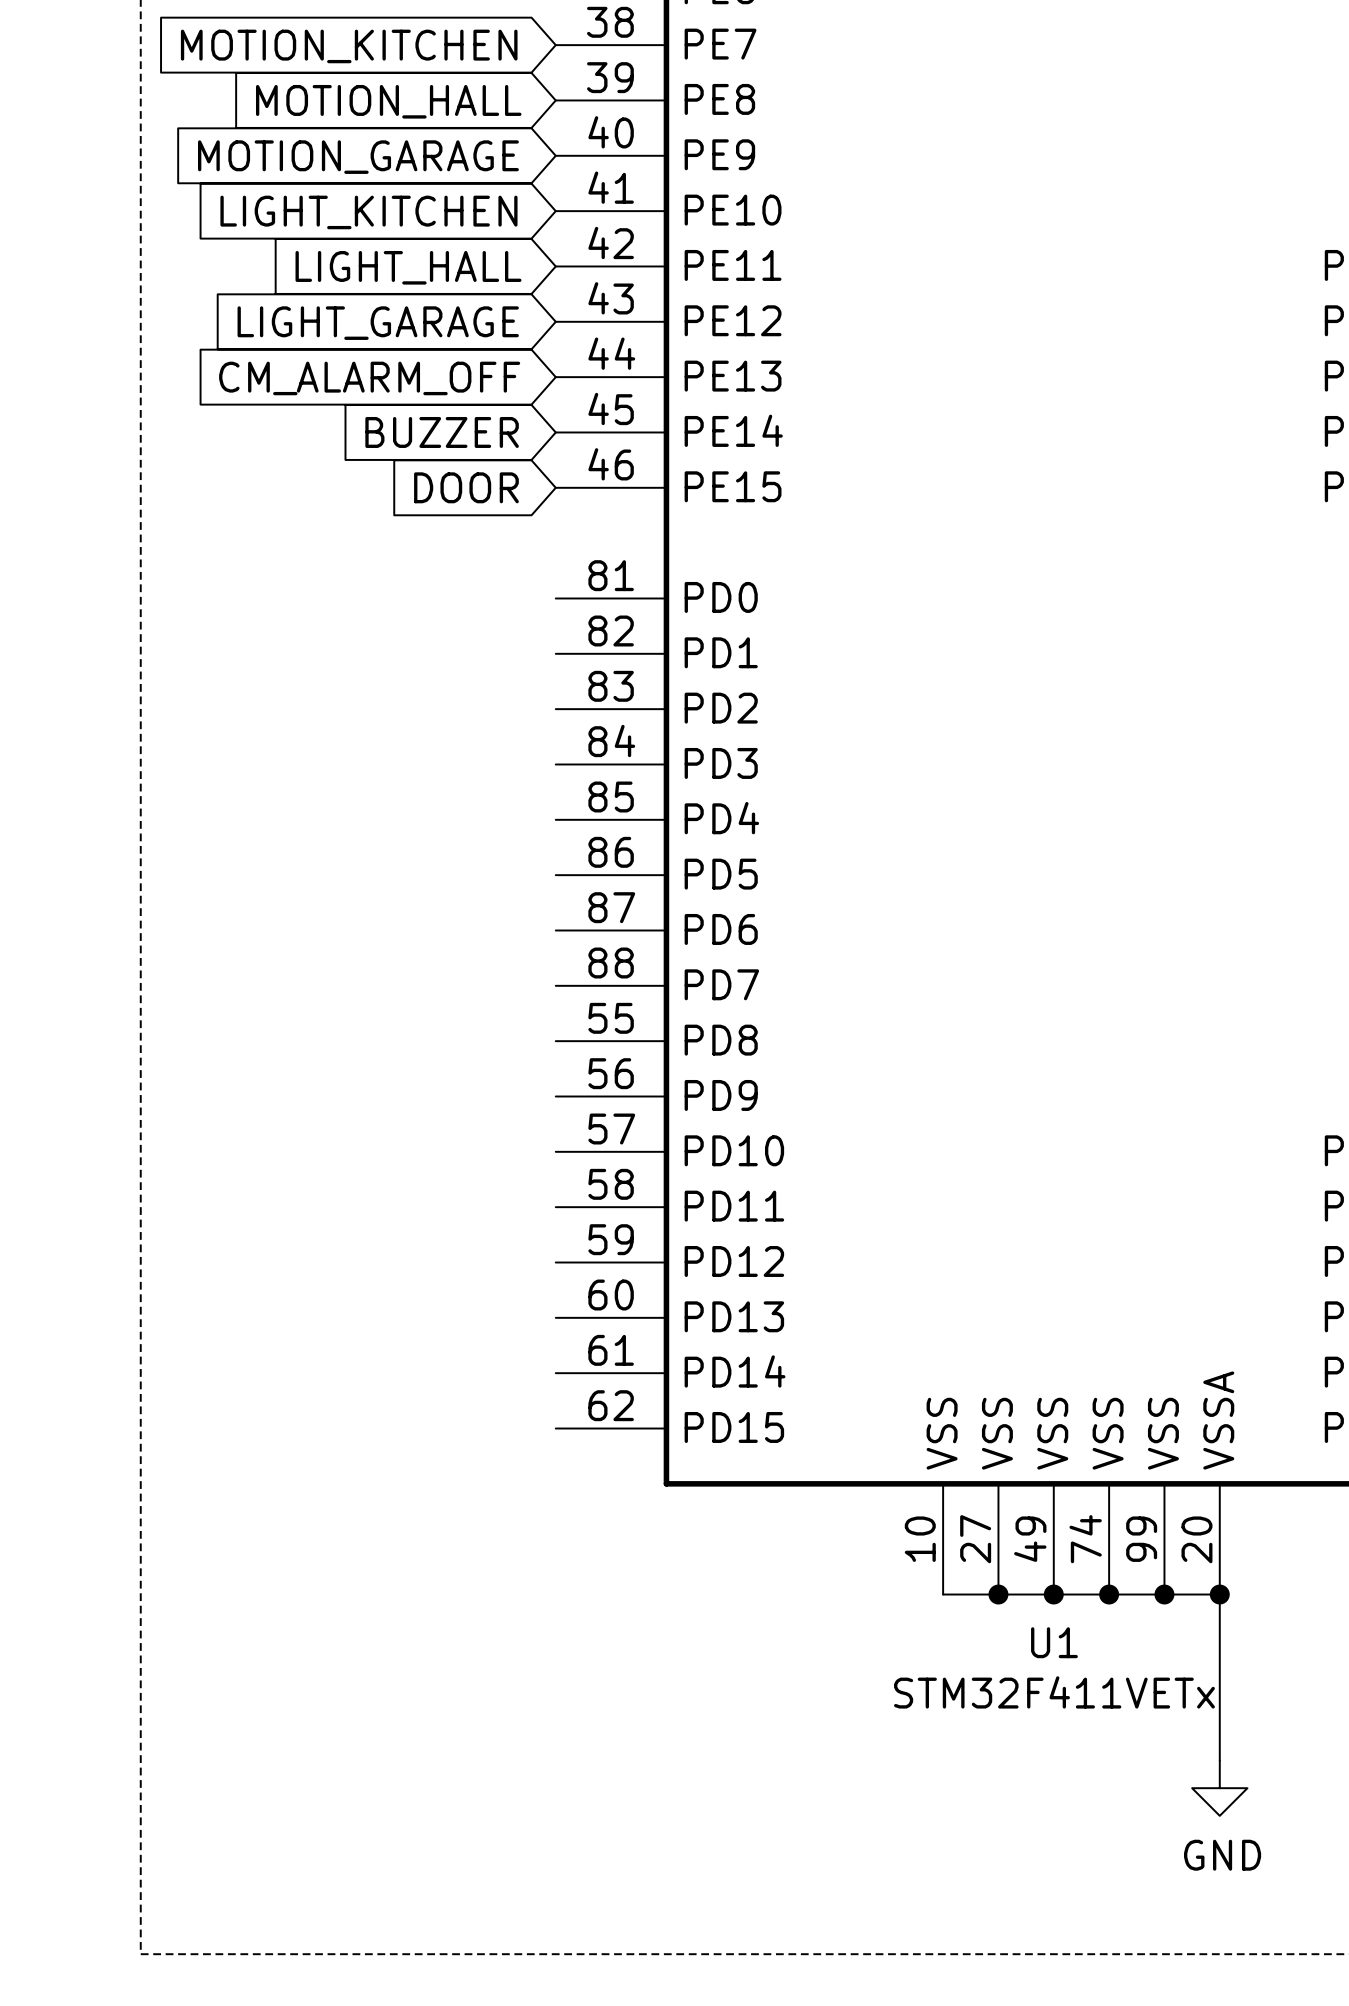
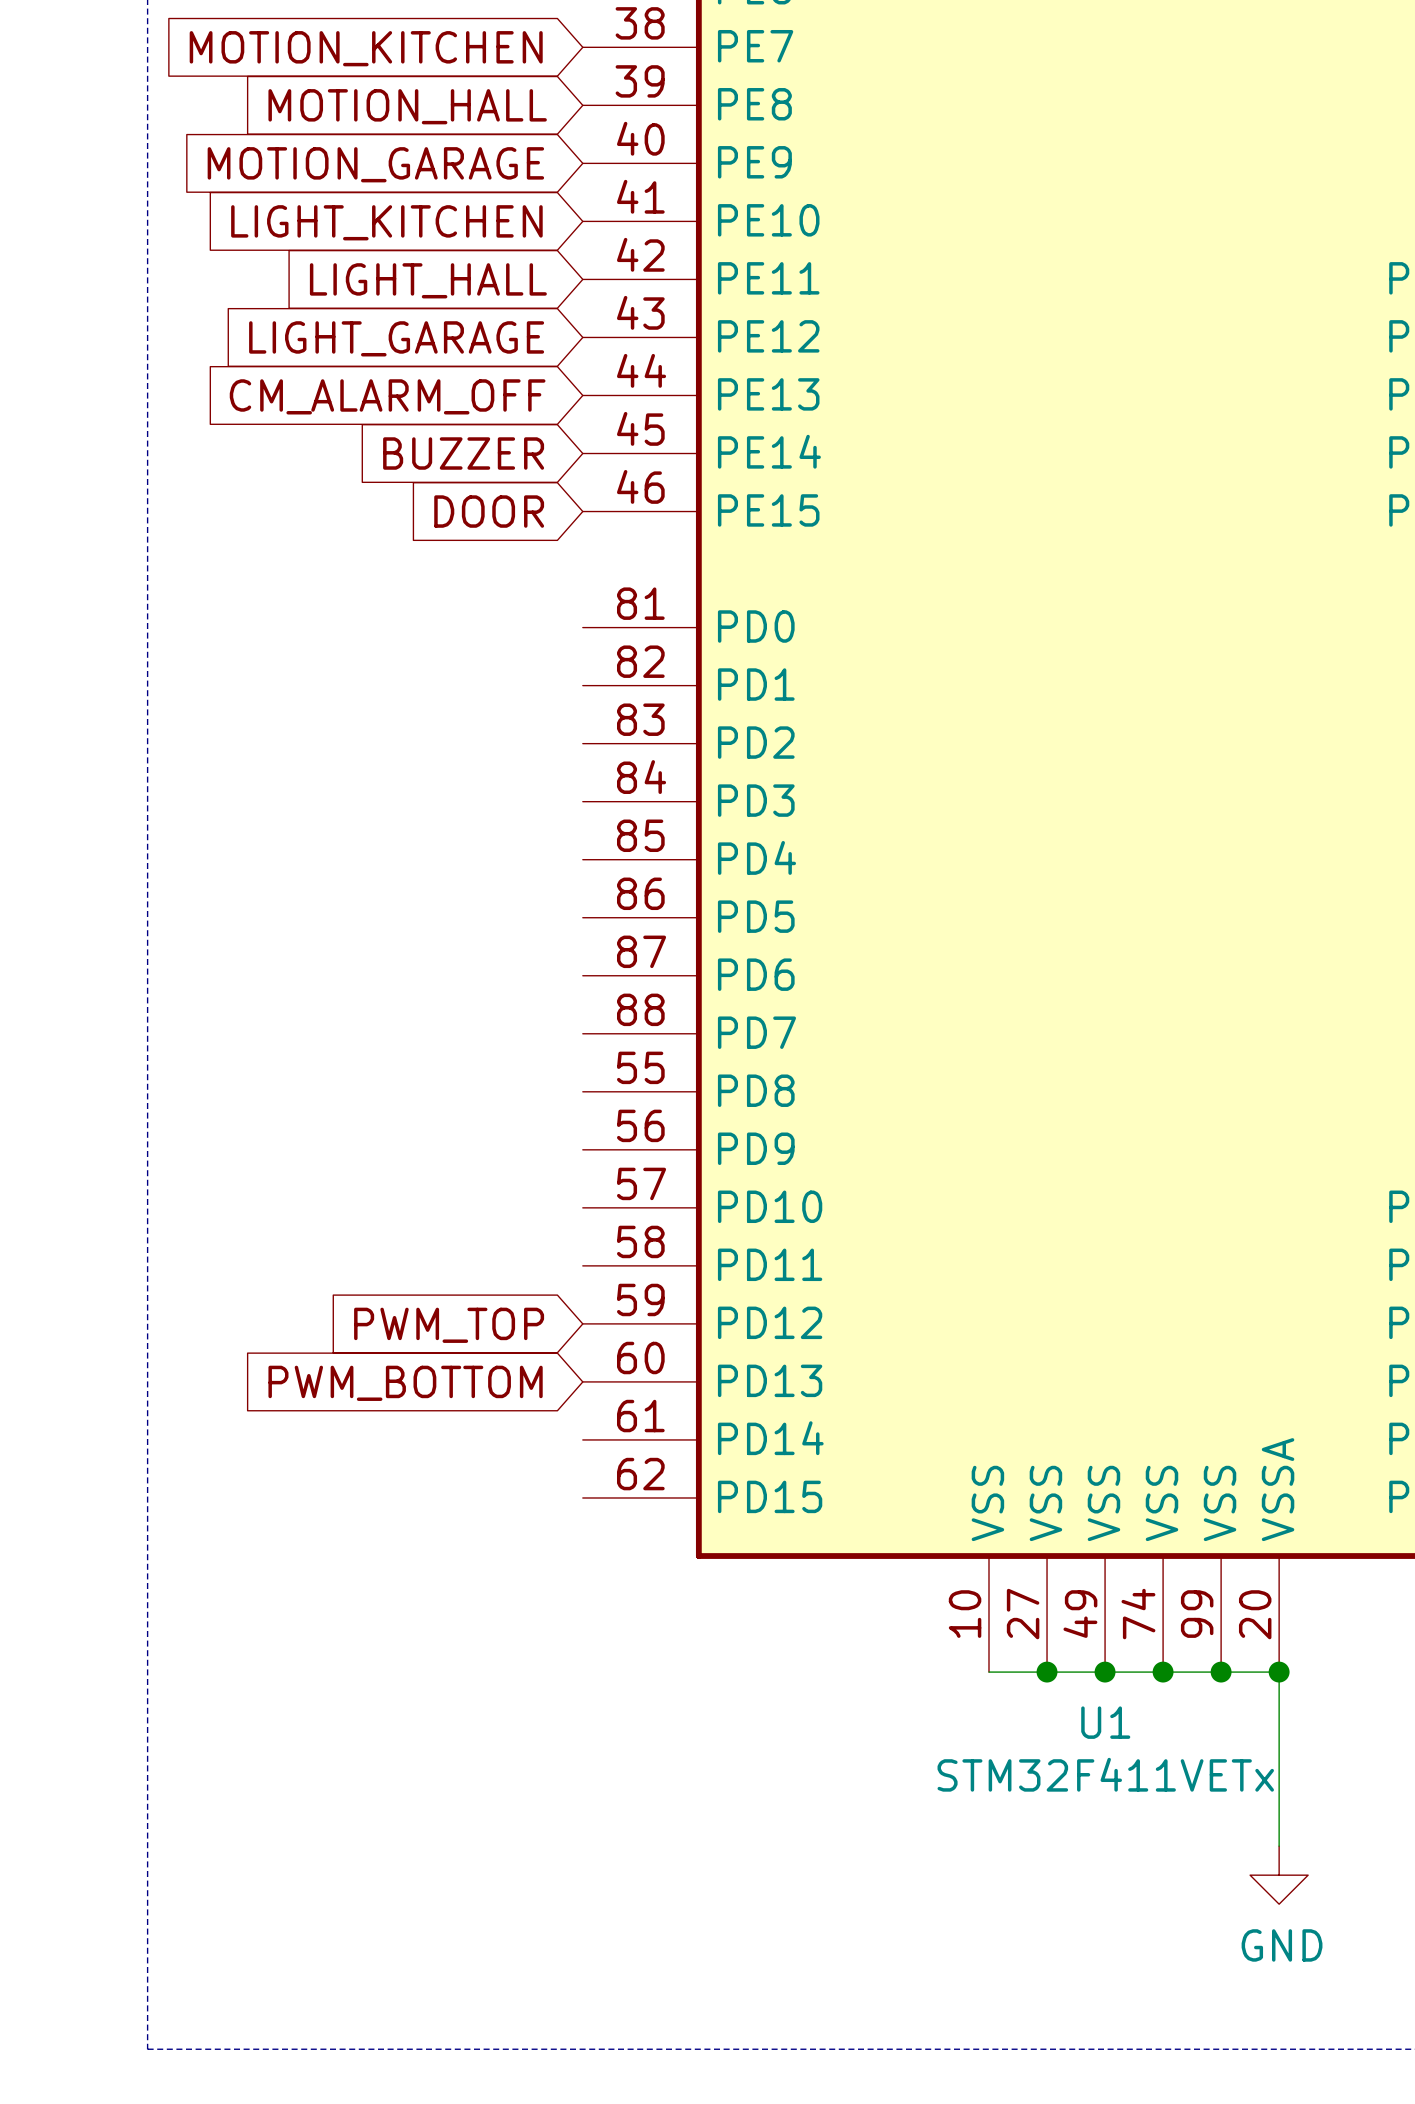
global label: none -> PWM_TOP (449, 1325)
global label: none -> PWM_BOTTOM (405, 1383)

